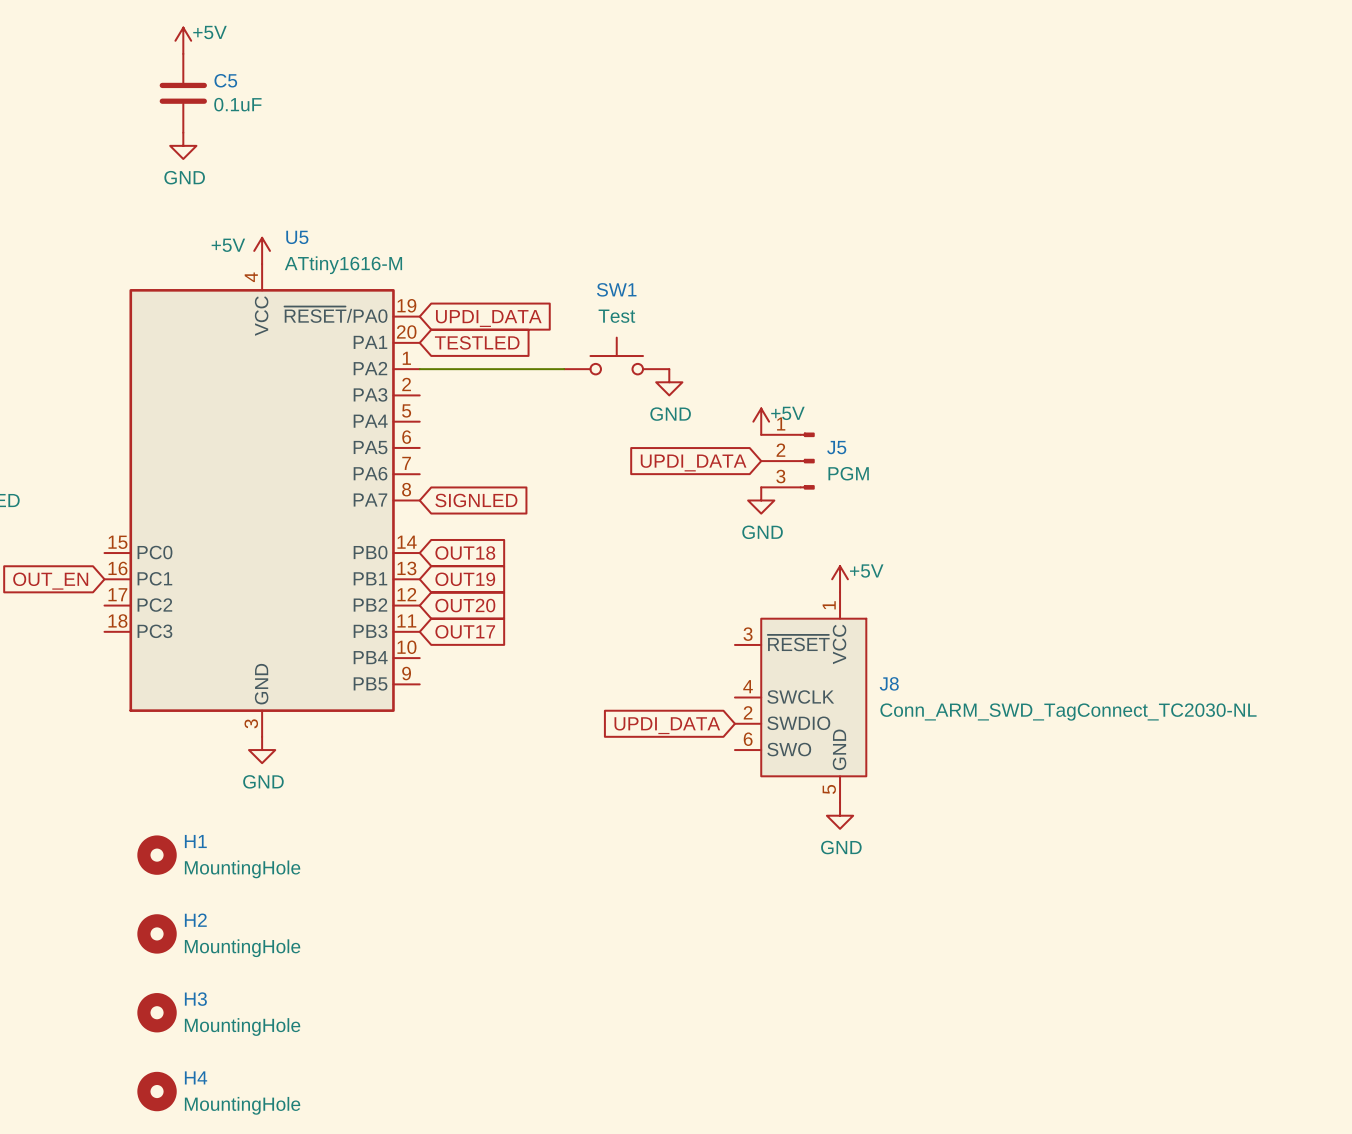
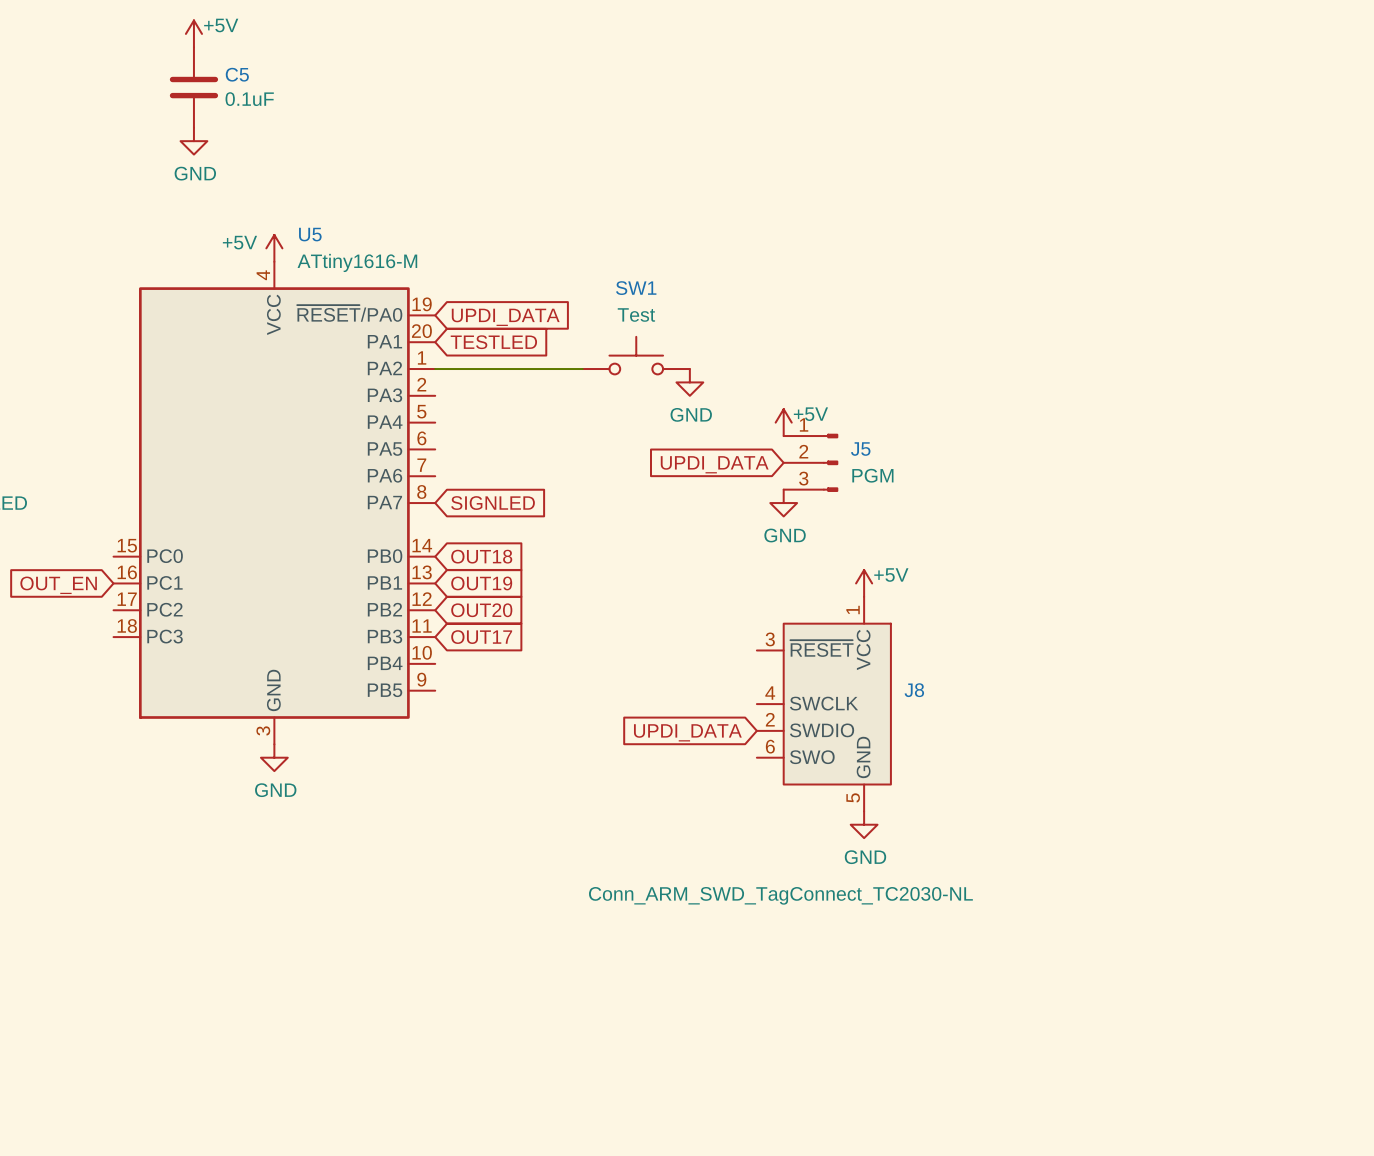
J8 value position: Conn_ARM_SWD_TagConnect_TC2030-NL (1068, 712) -> Conn_ARM_SWD_TagConnect_TC2030-NL (780, 895)
H1: MountingHole (157, 855) -> none
H2: MountingHole (157, 933) -> none
H3: MountingHole (157, 1012) -> none
H4: MountingHole (157, 1091) -> none

